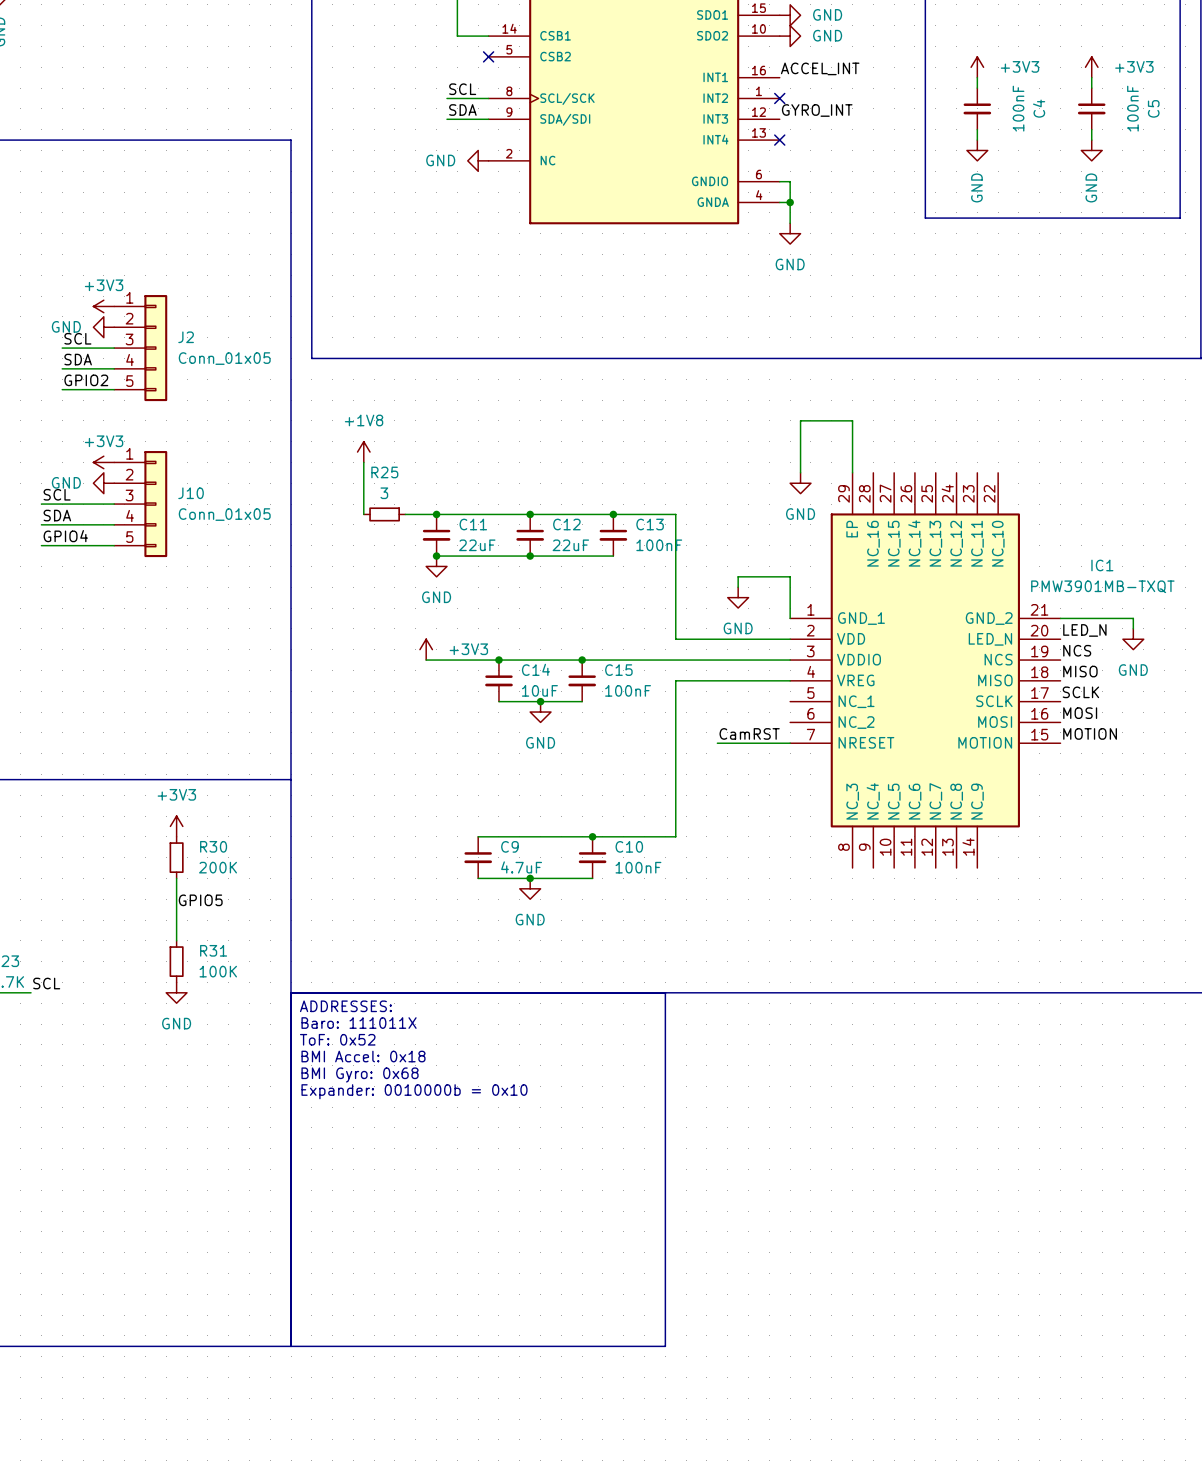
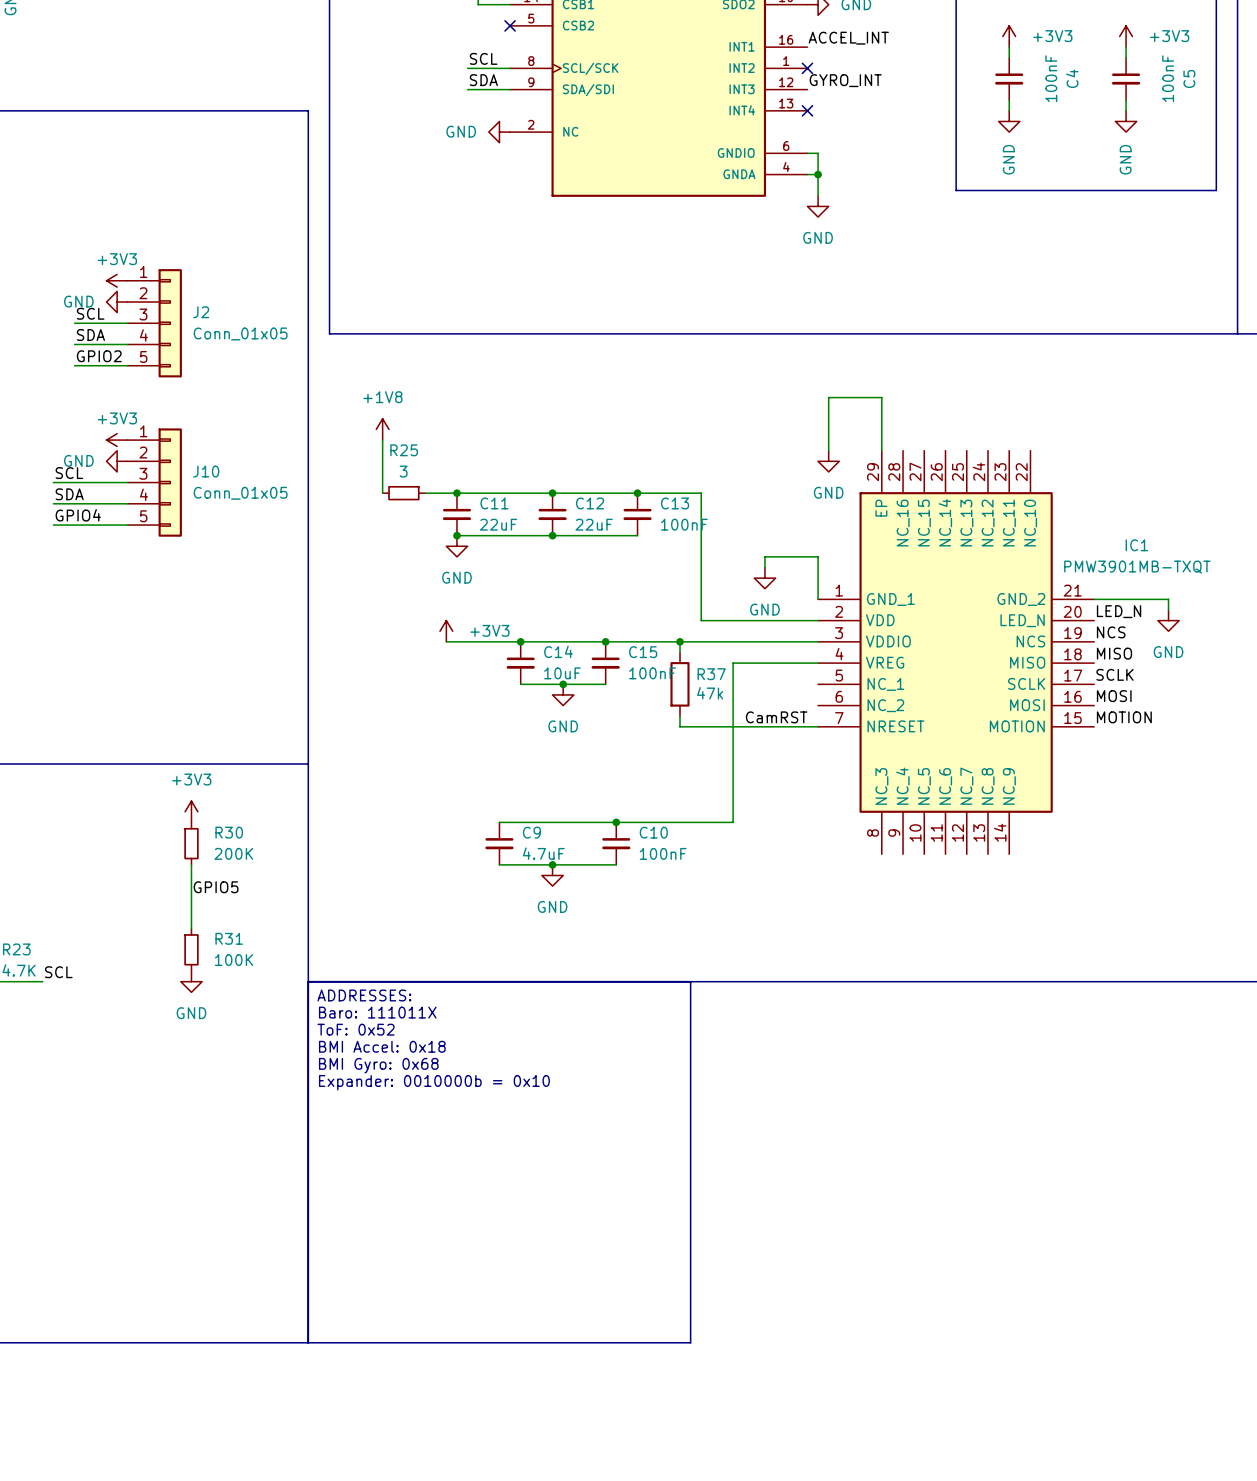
wire: none -> (680, 641) (680, 652)
junction: none -> (680, 641)
wire: (706, 680) (675, 680) (675, 836) -> (733, 663) (733, 822) (701, 822)
R37: none -> 47k (680, 684)
wire: none -> (680, 716) (680, 726) (743, 726)

